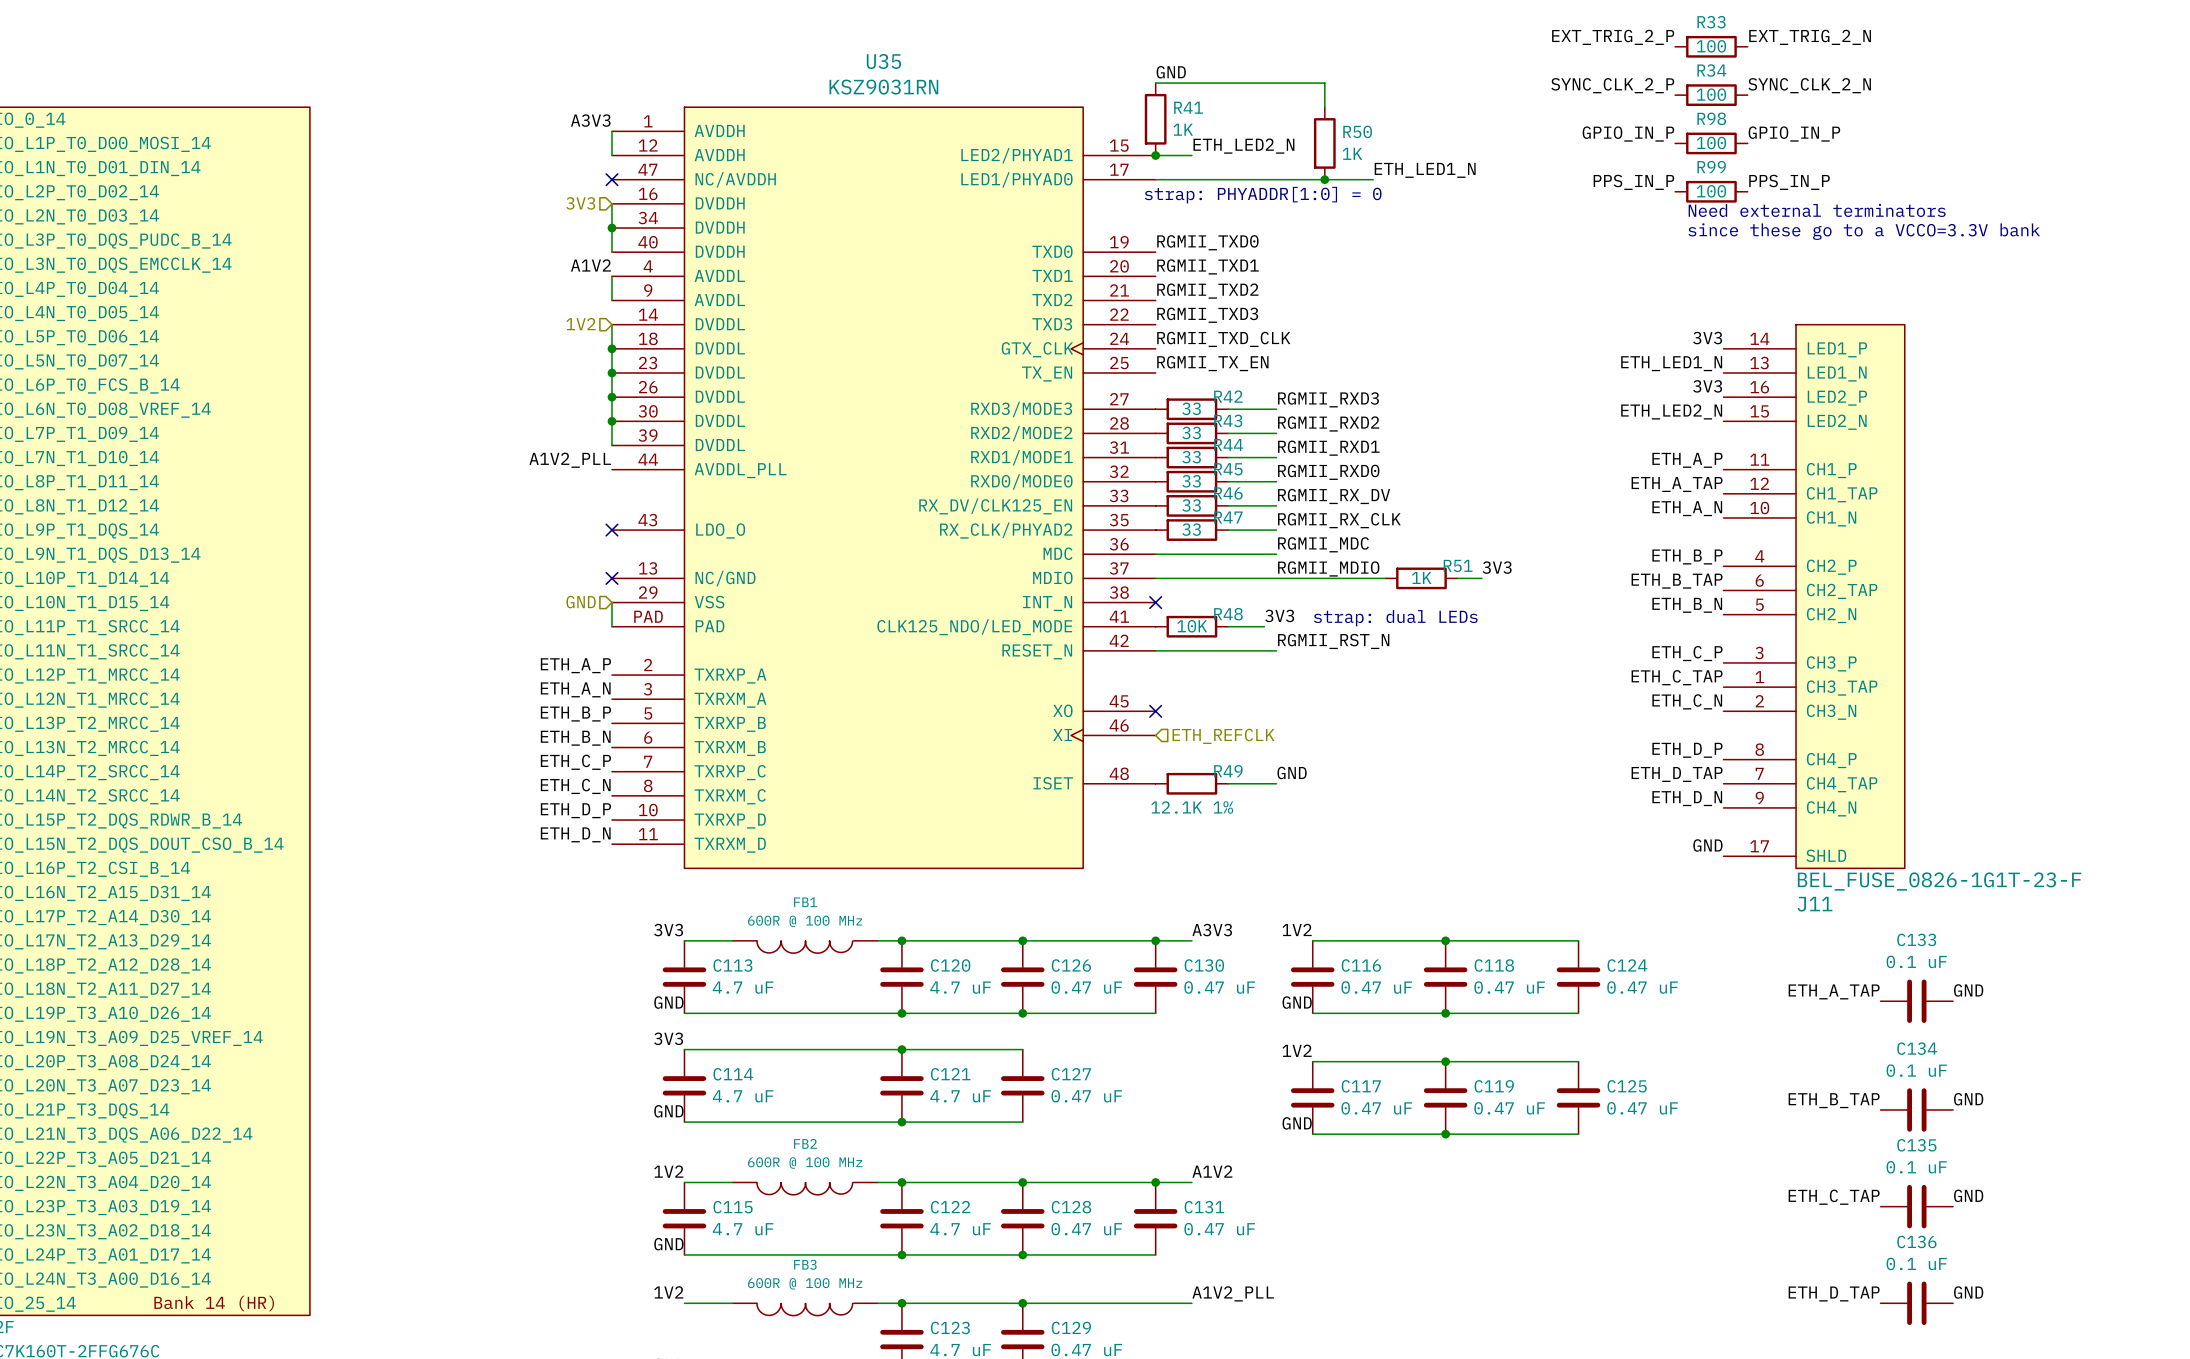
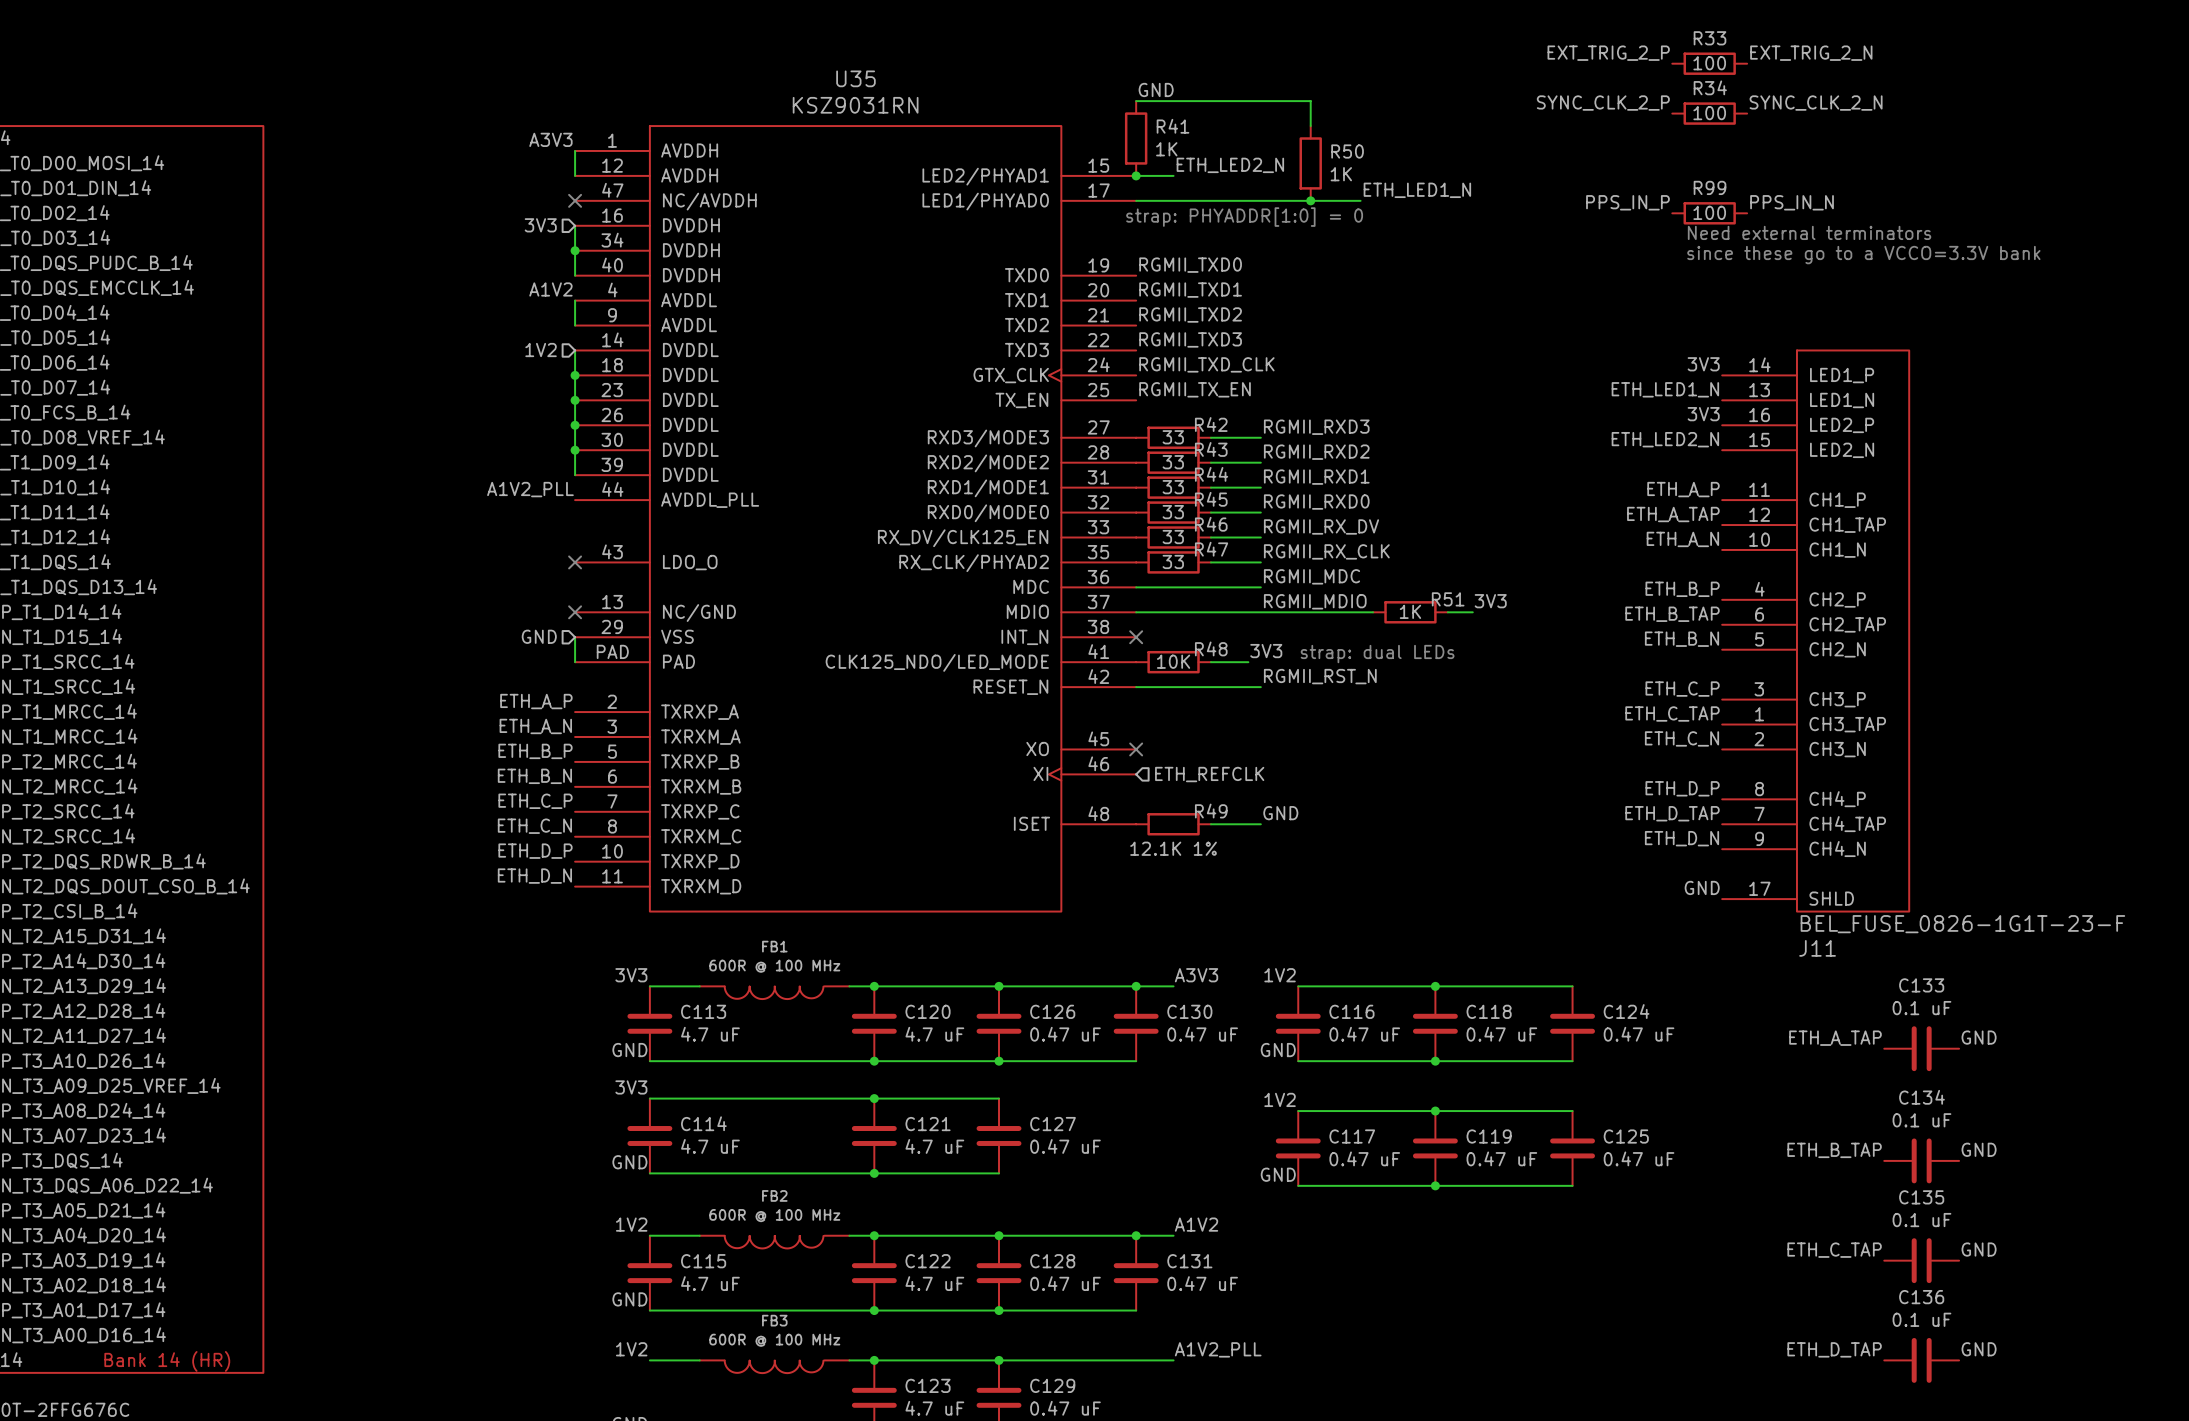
label: GPIO_IN_P (1628, 134) -> none
label: GPIO_IN_P (1794, 134) -> none
R98: 100 (1711, 143) -> none
label: PPS_IN_P (1789, 182) -> PPS_IN_N (1792, 202)

